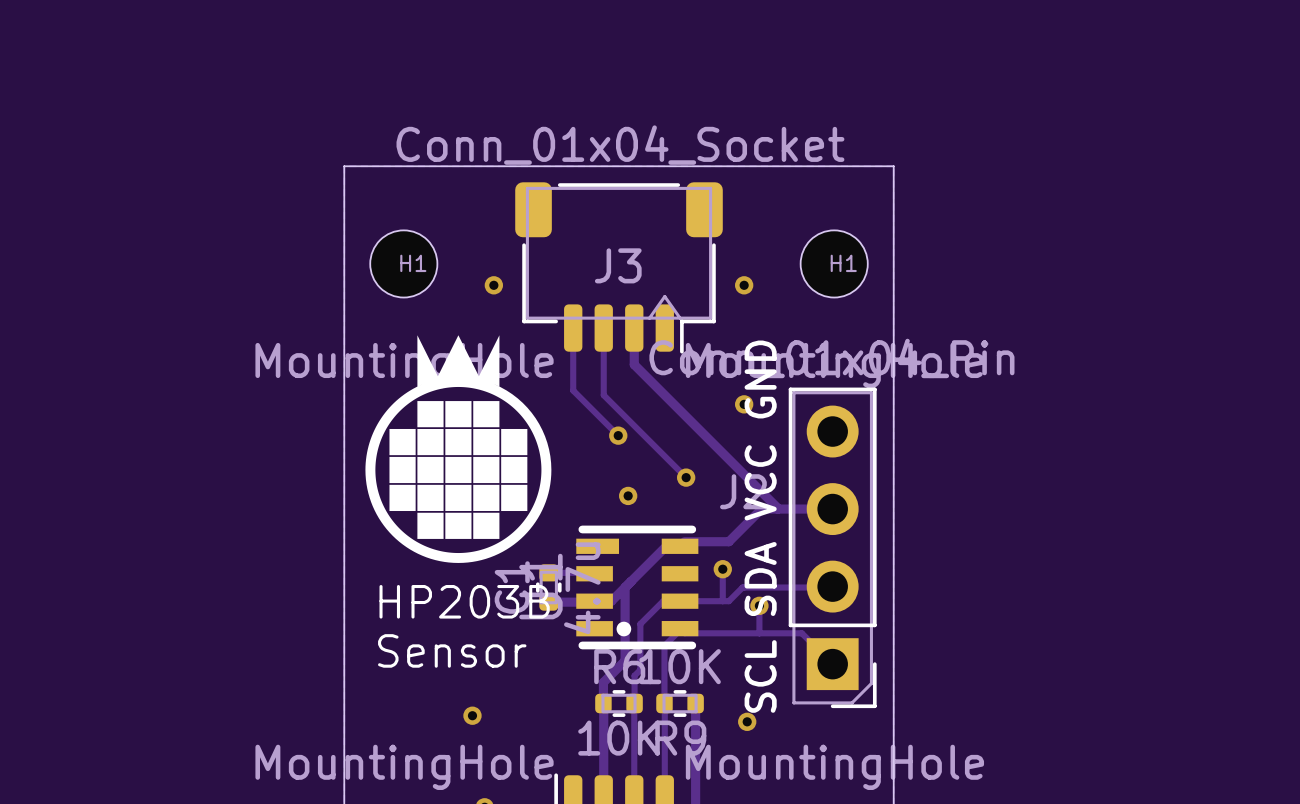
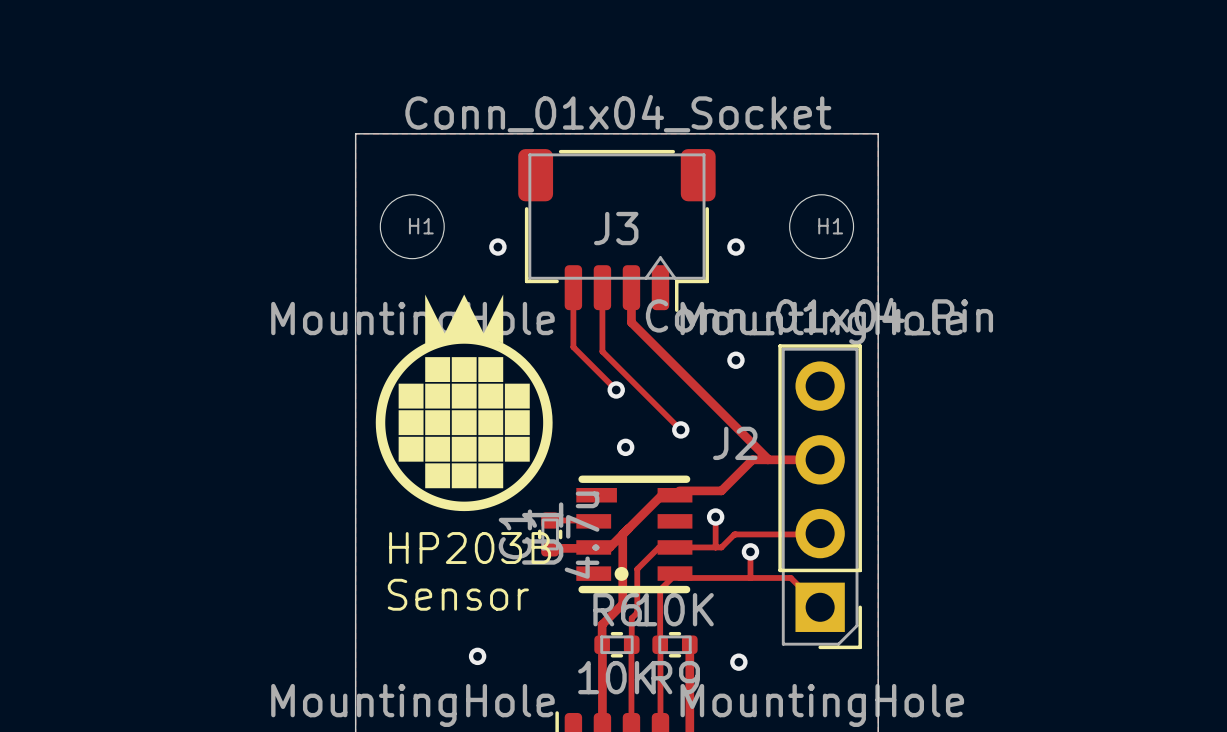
text: SCL SDA VCC GND (760, 526) -> none

